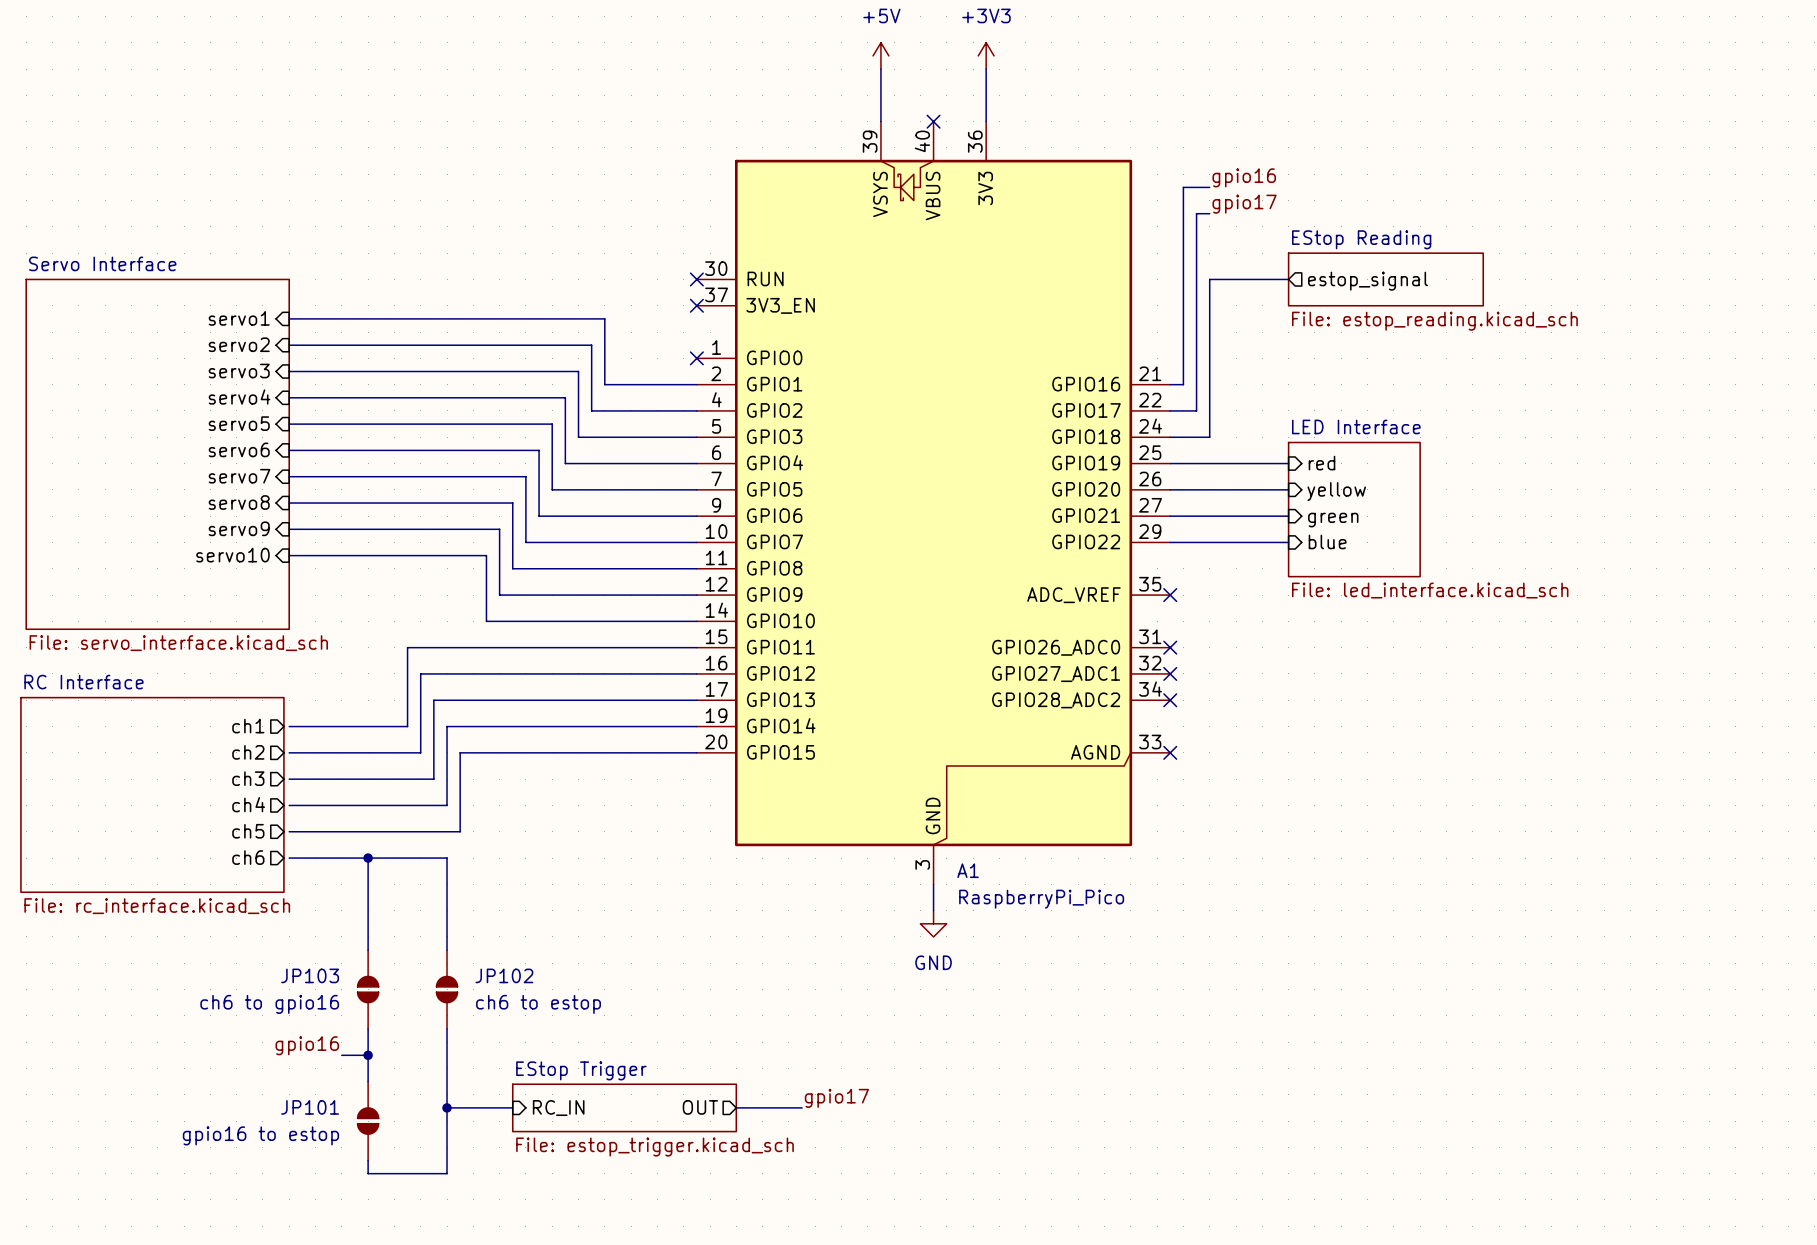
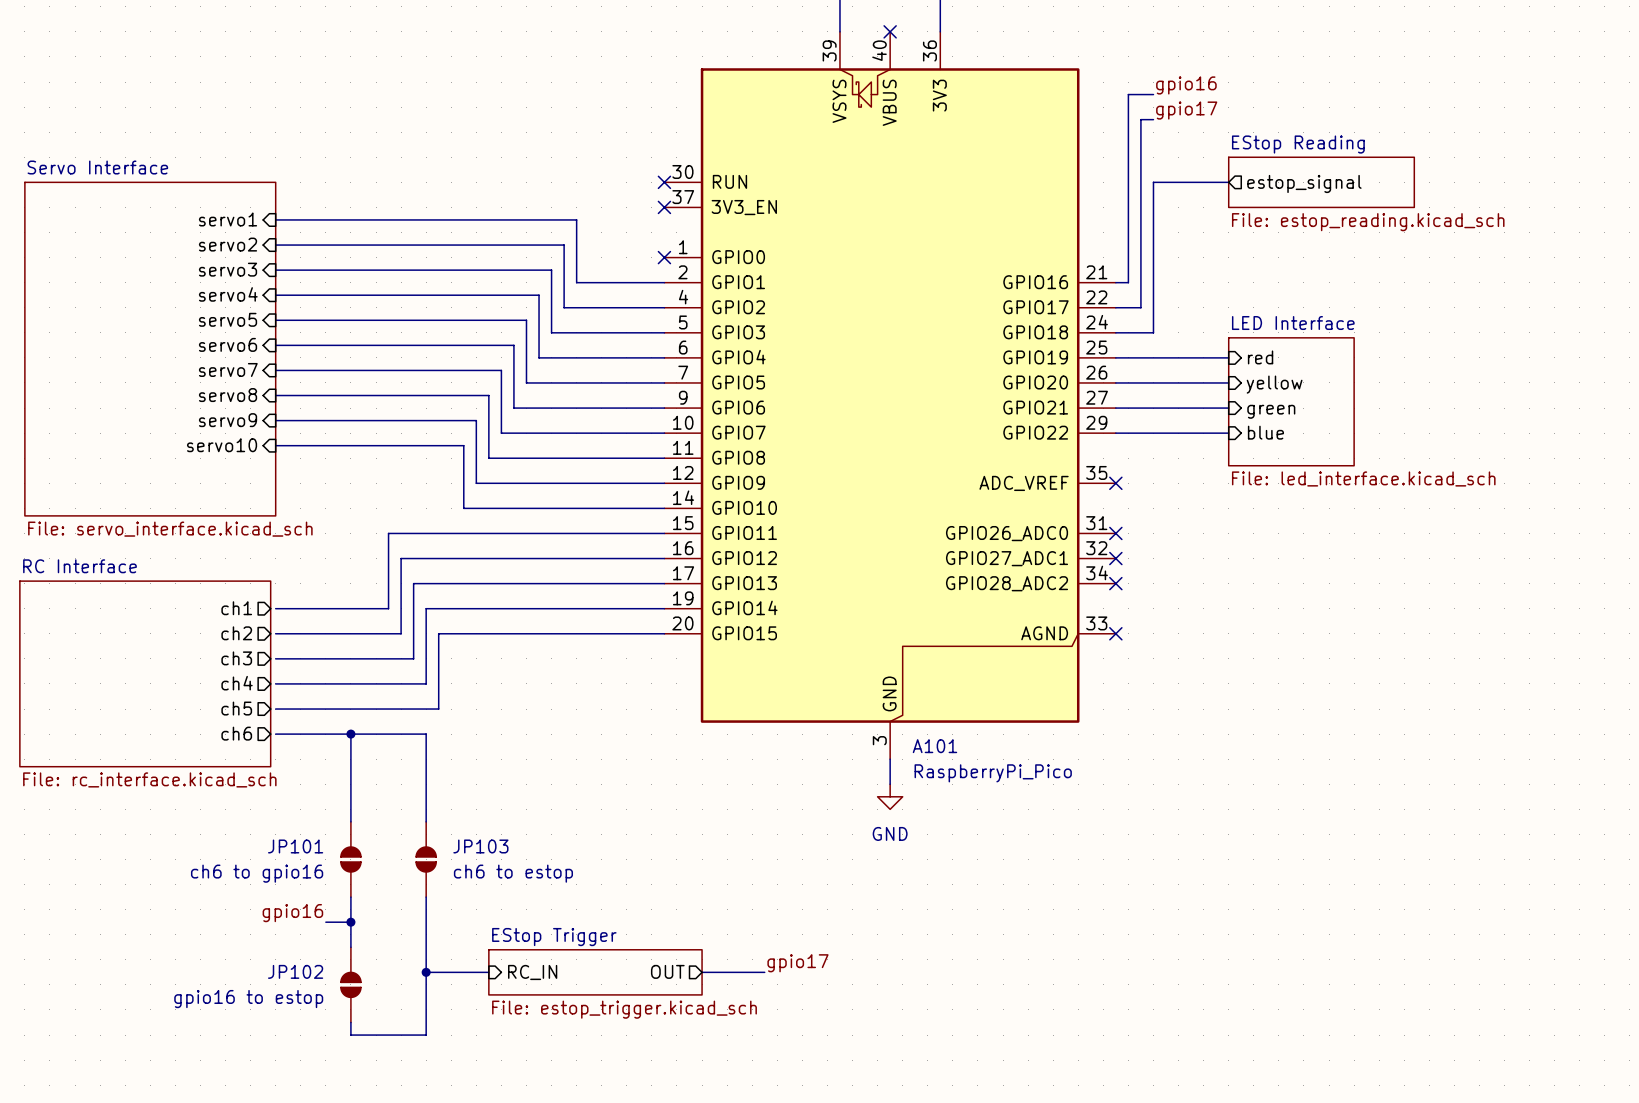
A1 name: A1 (968, 870) -> A101 (934, 746)
JP103 name: JP103 (310, 975) -> JP101 (295, 846)
JP102 name: JP102 (504, 975) -> JP103 (480, 846)
JP101 name: JP101 (310, 1107) -> JP102 (295, 971)

